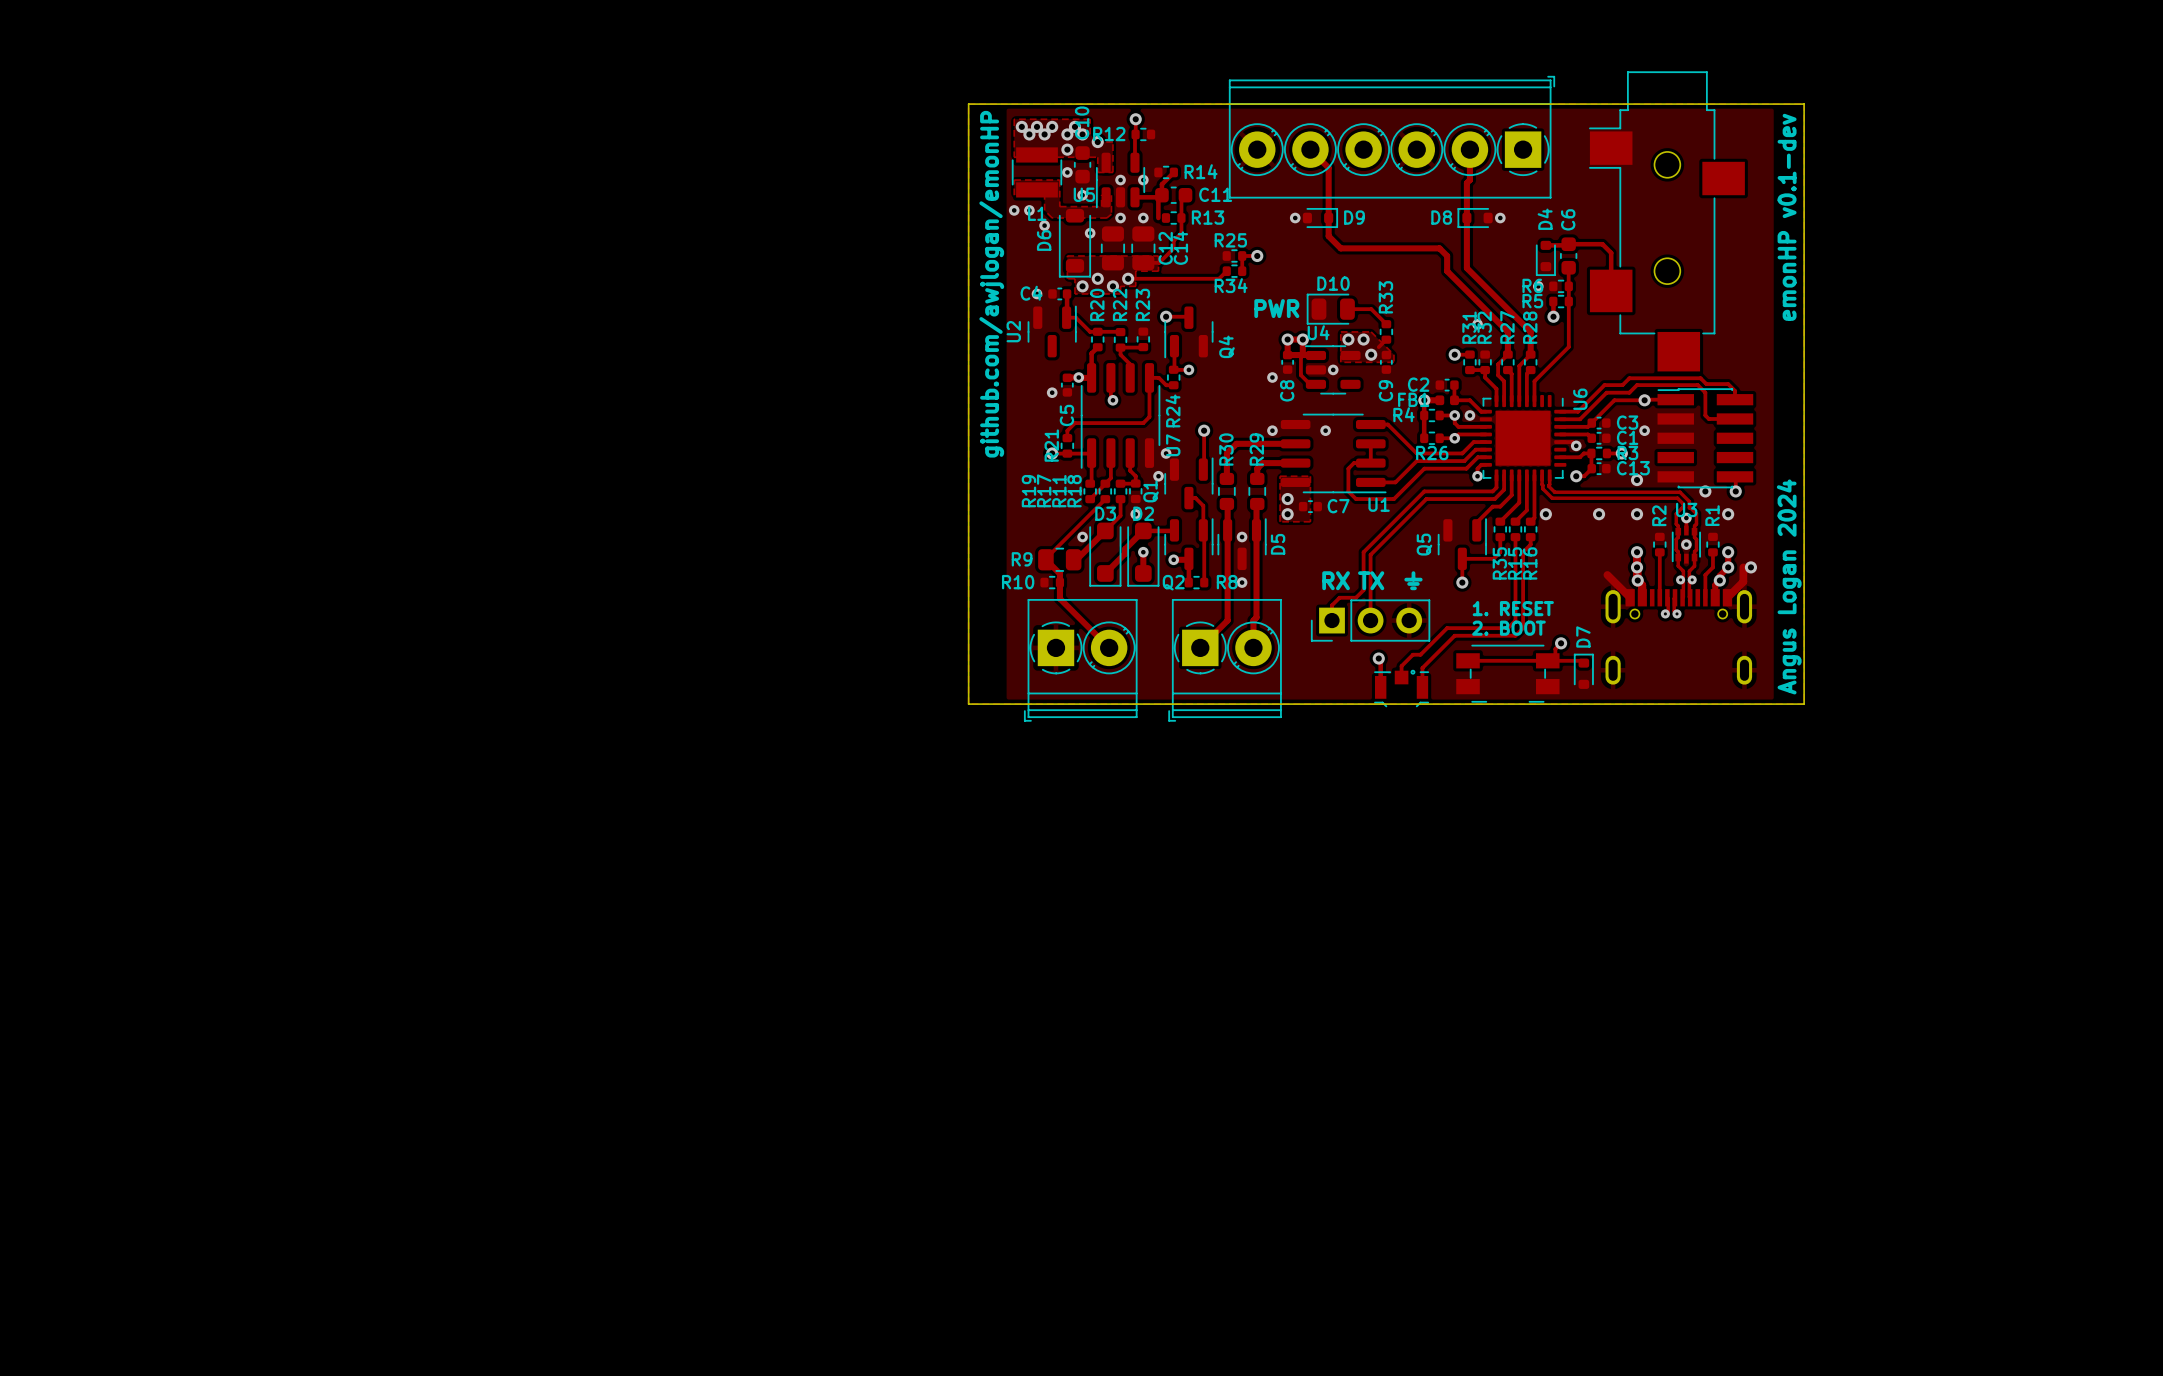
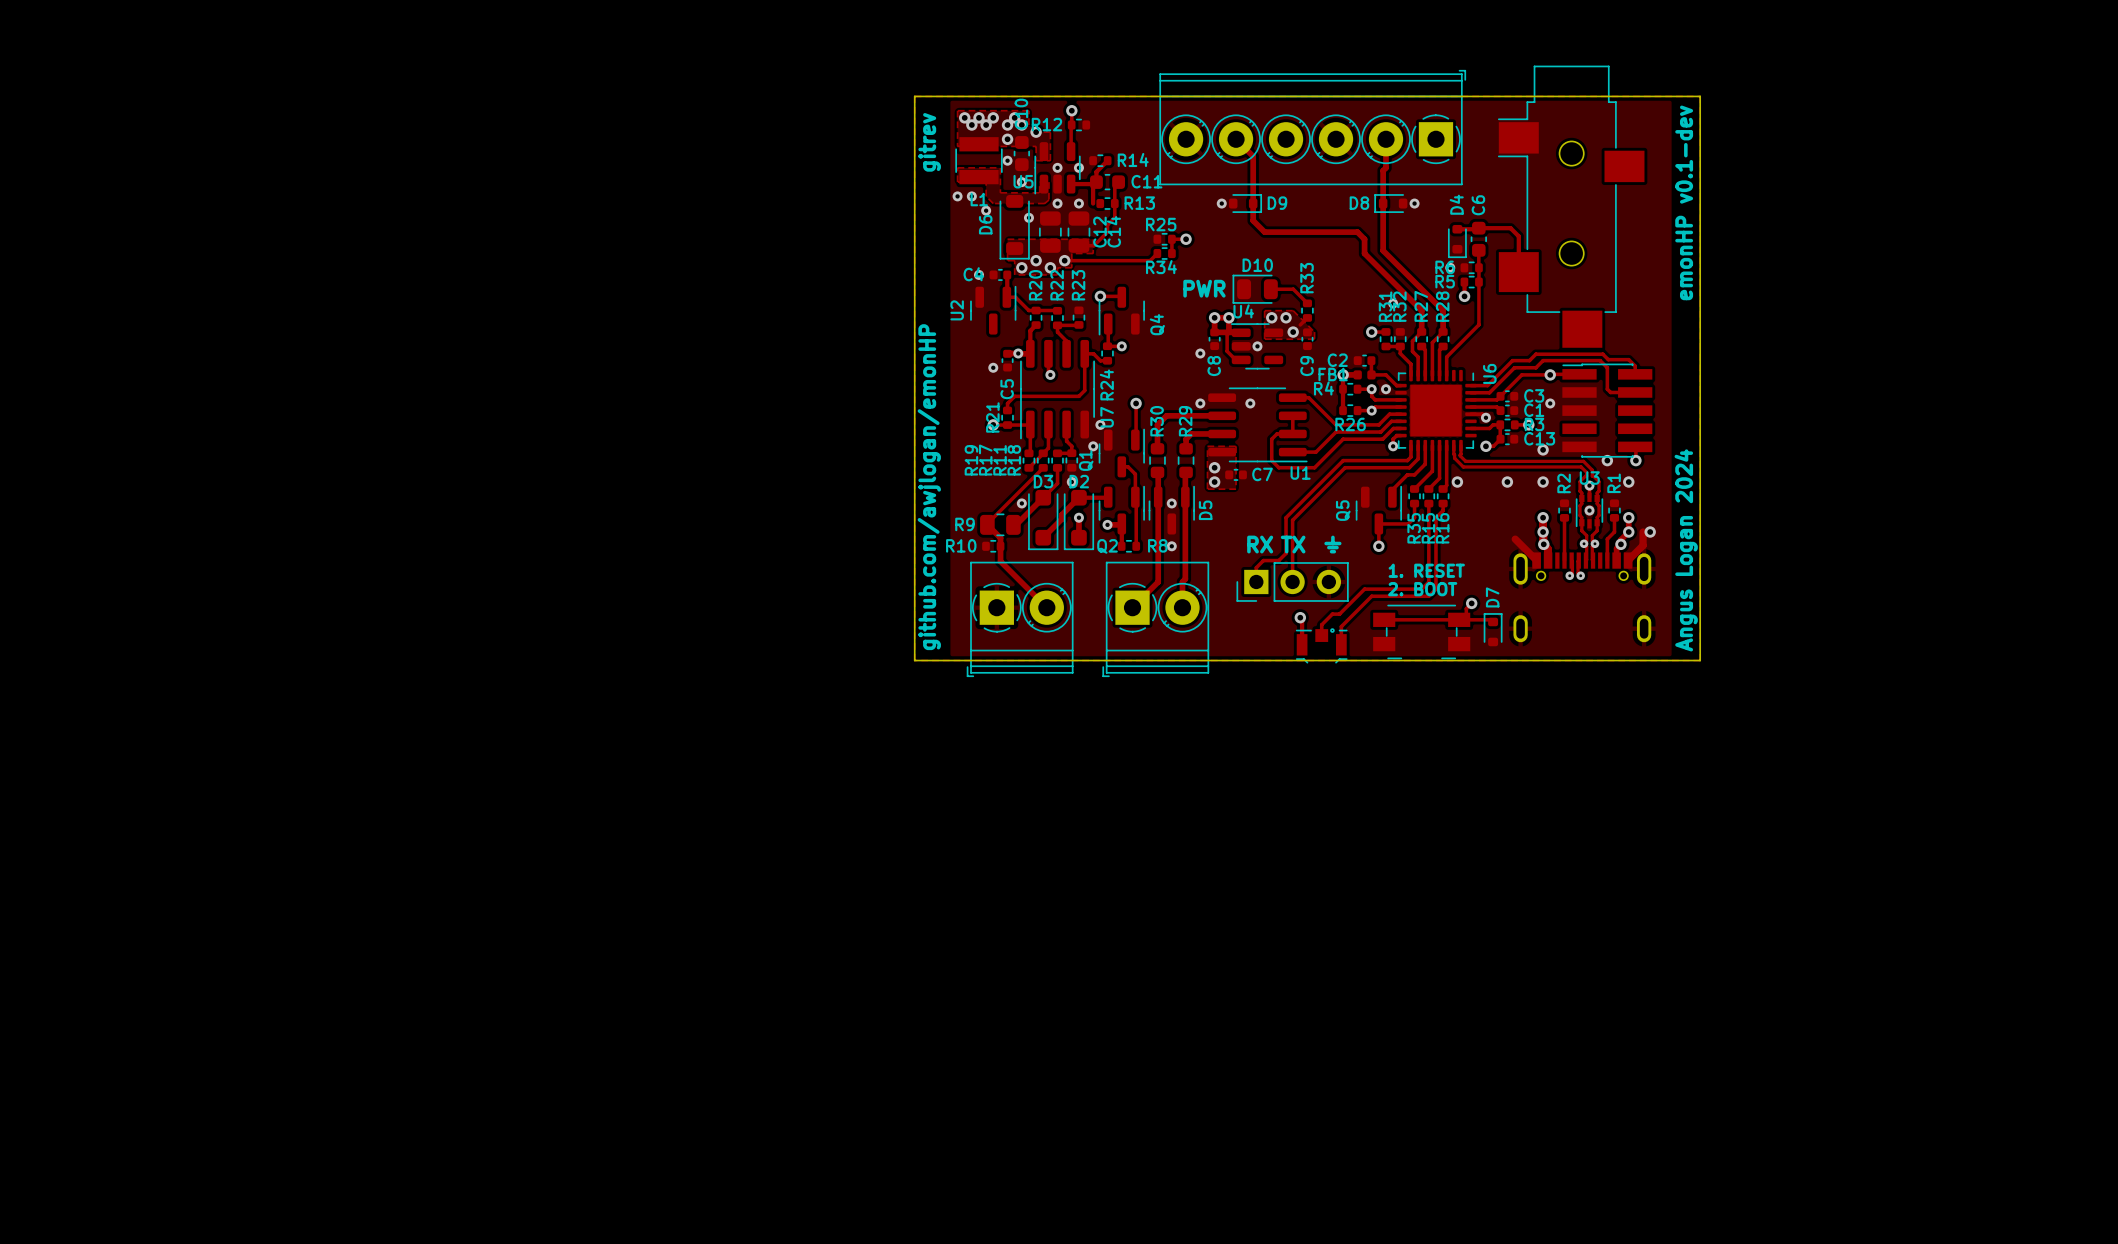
text: none -> gitrev (929, 142)
text position: github.com/awjlogan/emonHP (991, 284) -> github.com/awjlogan/emonHP (929, 487)

